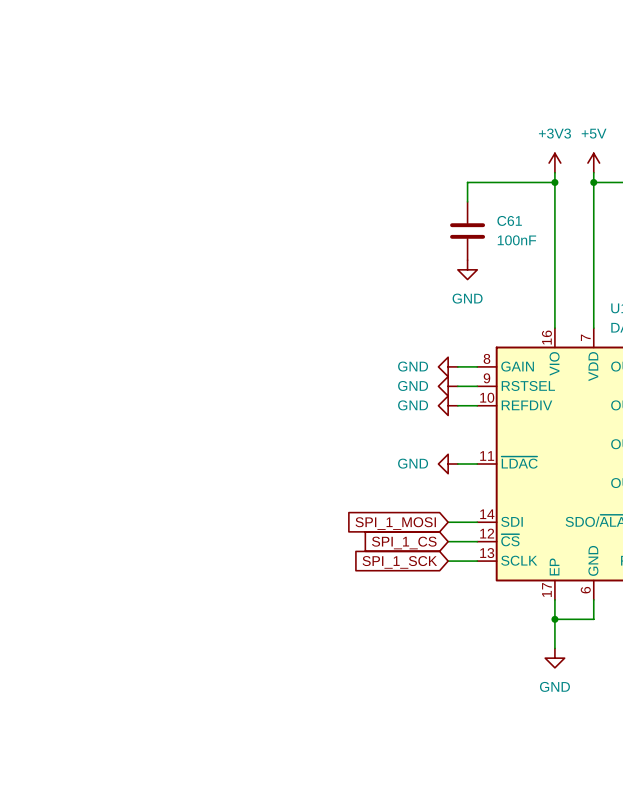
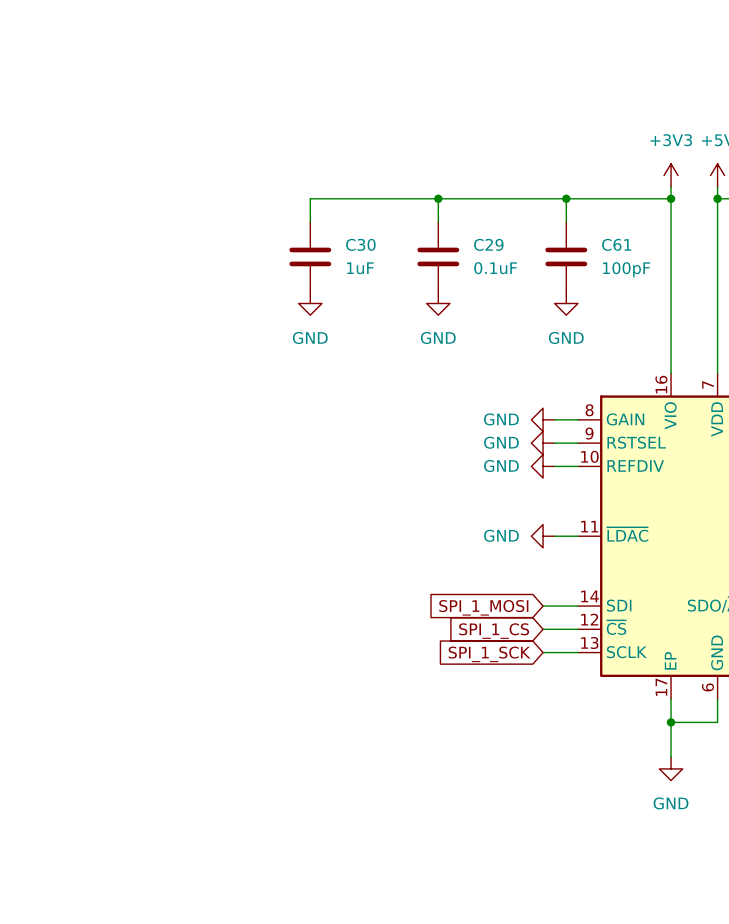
wire: none -> (438, 198) (438, 222)
junction: none -> (438, 198)
wire: none -> (566, 198) (310, 198) (310, 222)
junction: none -> (566, 198)
C30: none -> 1uF (310, 256)
C29: none -> 0.1uF (438, 256)
C61 value: 100nF (516, 240) -> 100pF (626, 269)
power symbol: none -> GND (310, 303)
power symbol: none -> GND (438, 303)

